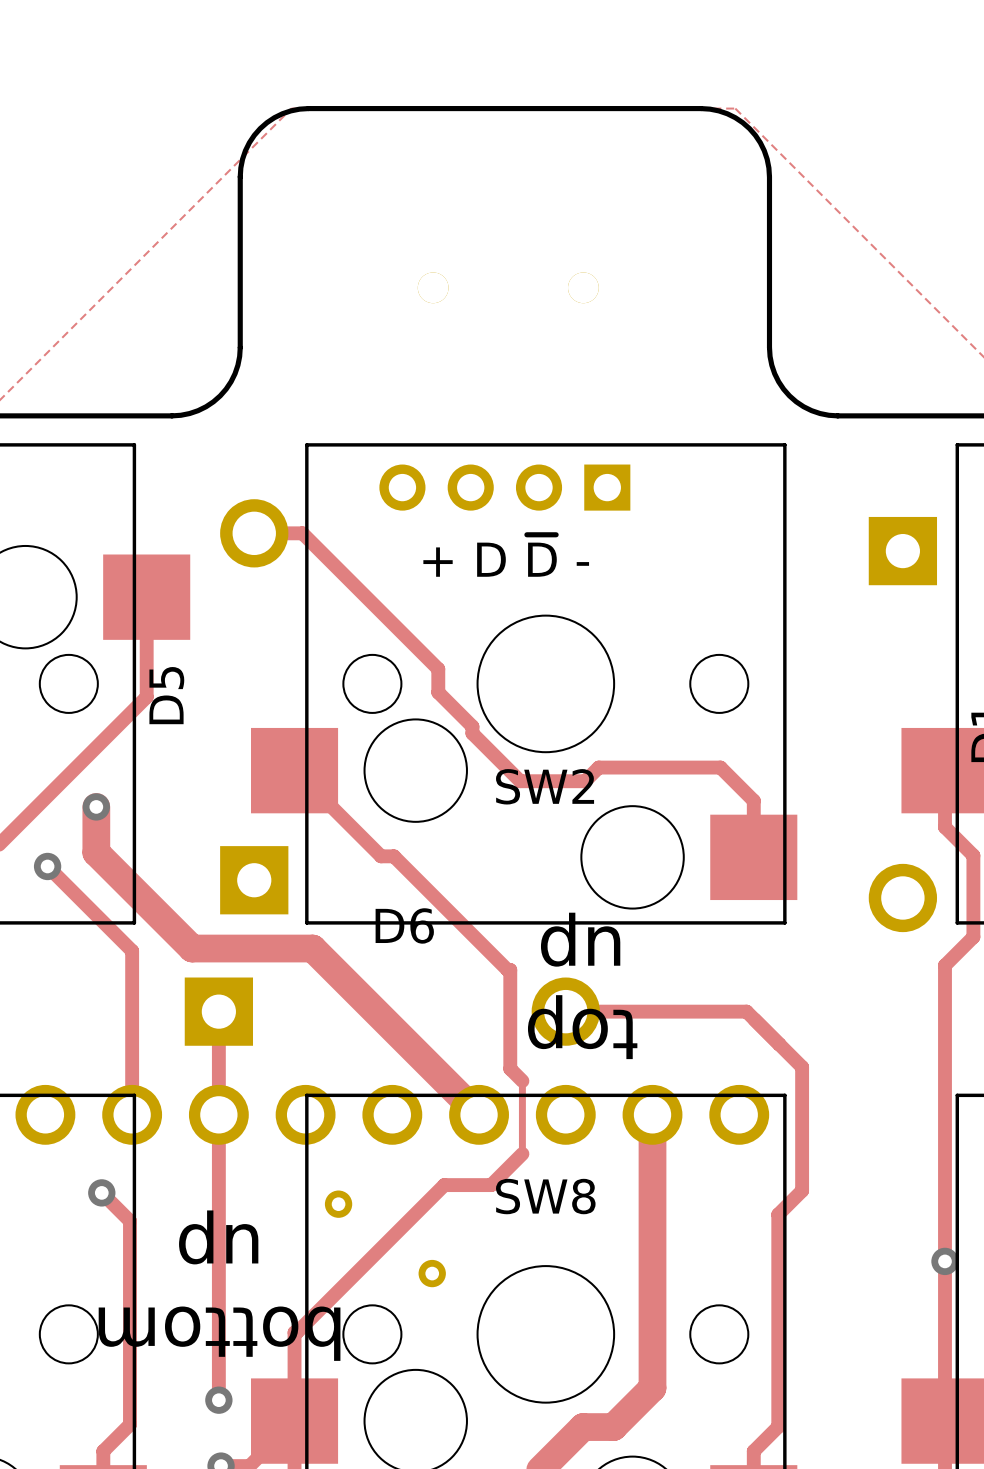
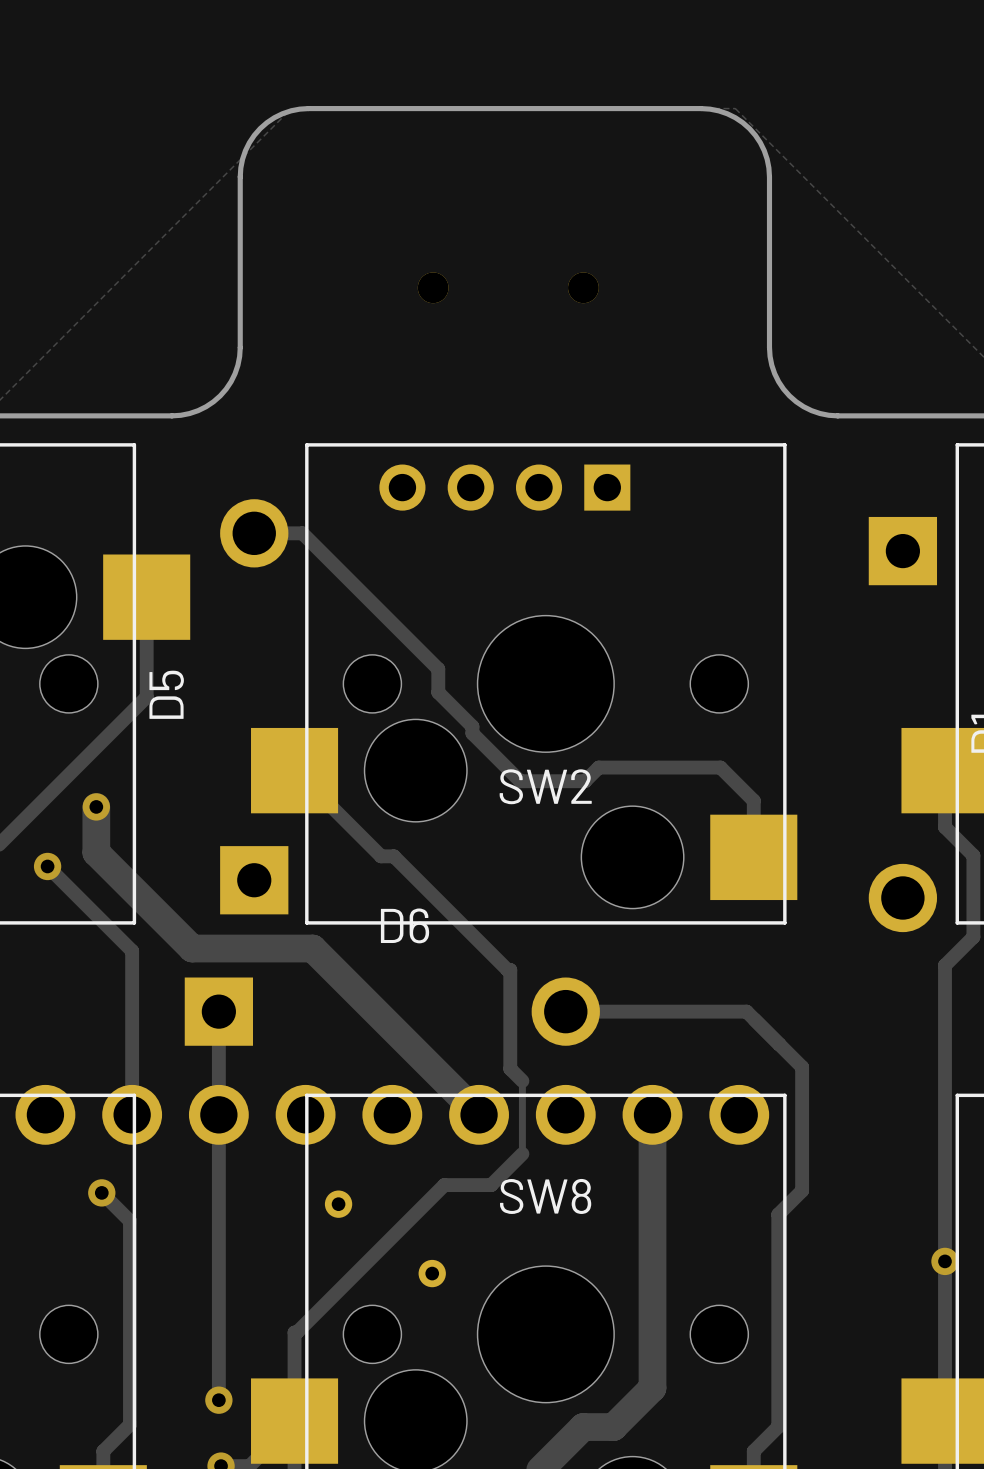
text: + D ~{D} - (506, 555) -> none
text: up (580, 939) -> none
text: top (582, 1027) -> none
text: up (218, 1237) -> none
text: bottom (219, 1333) -> none

